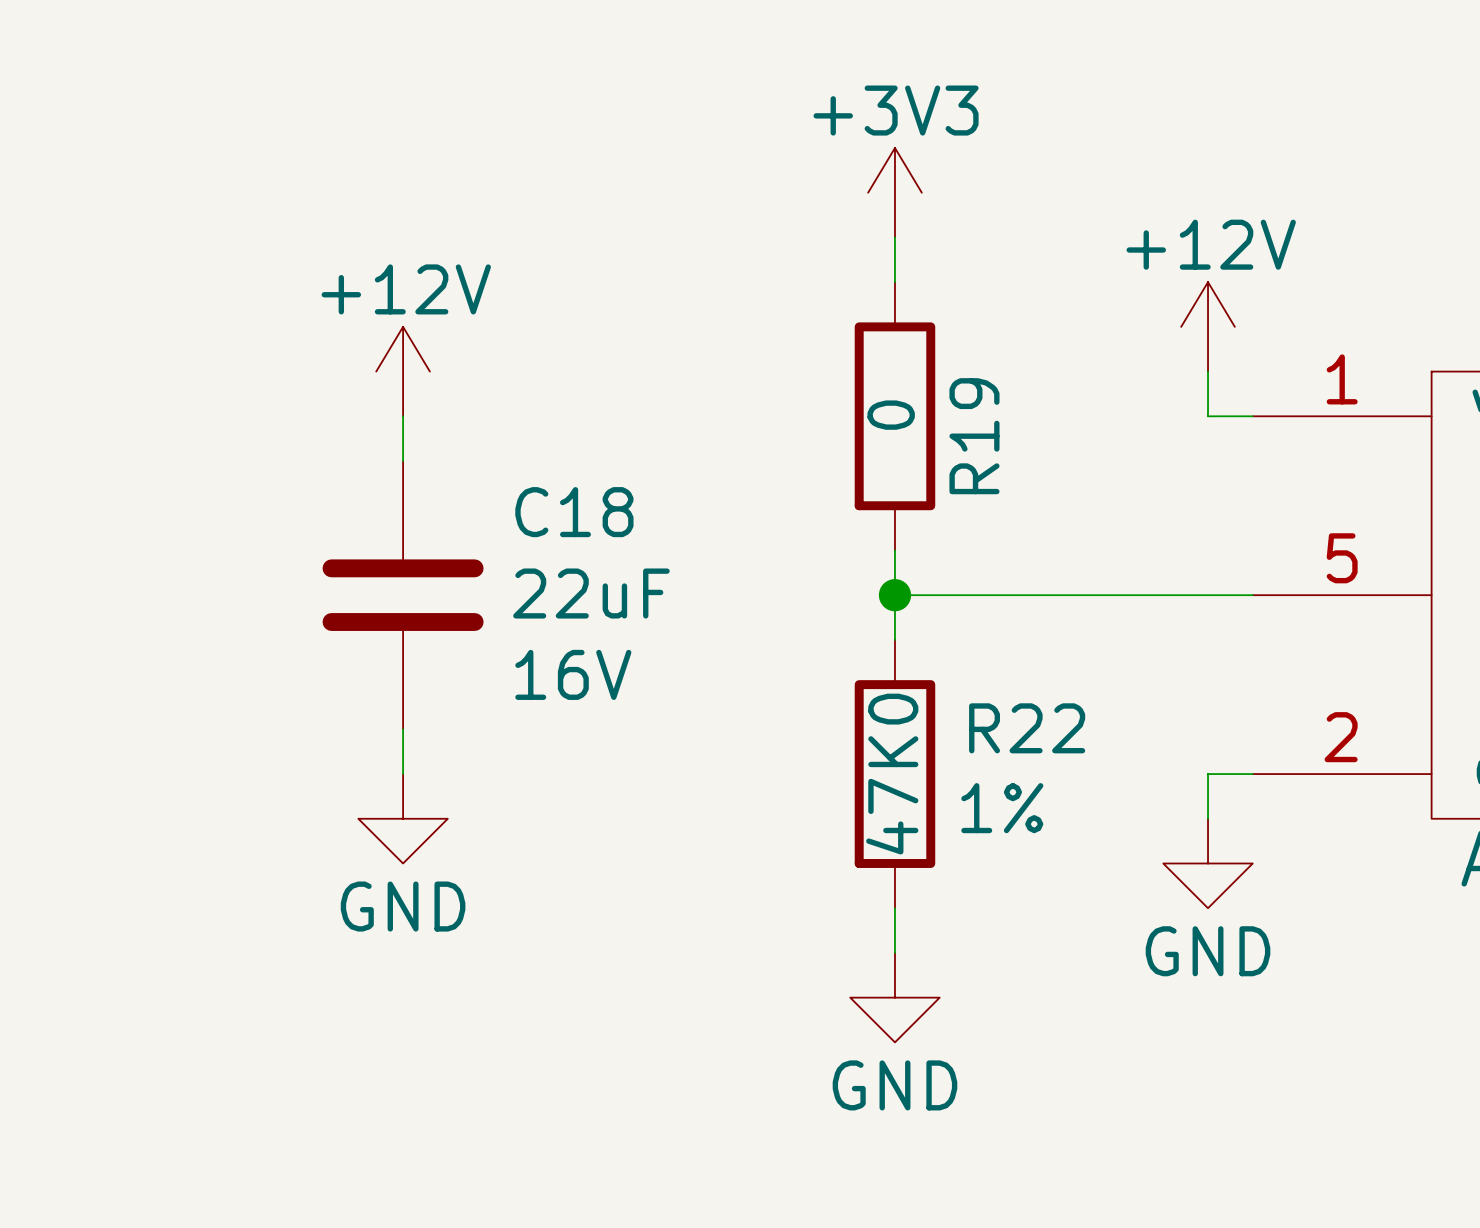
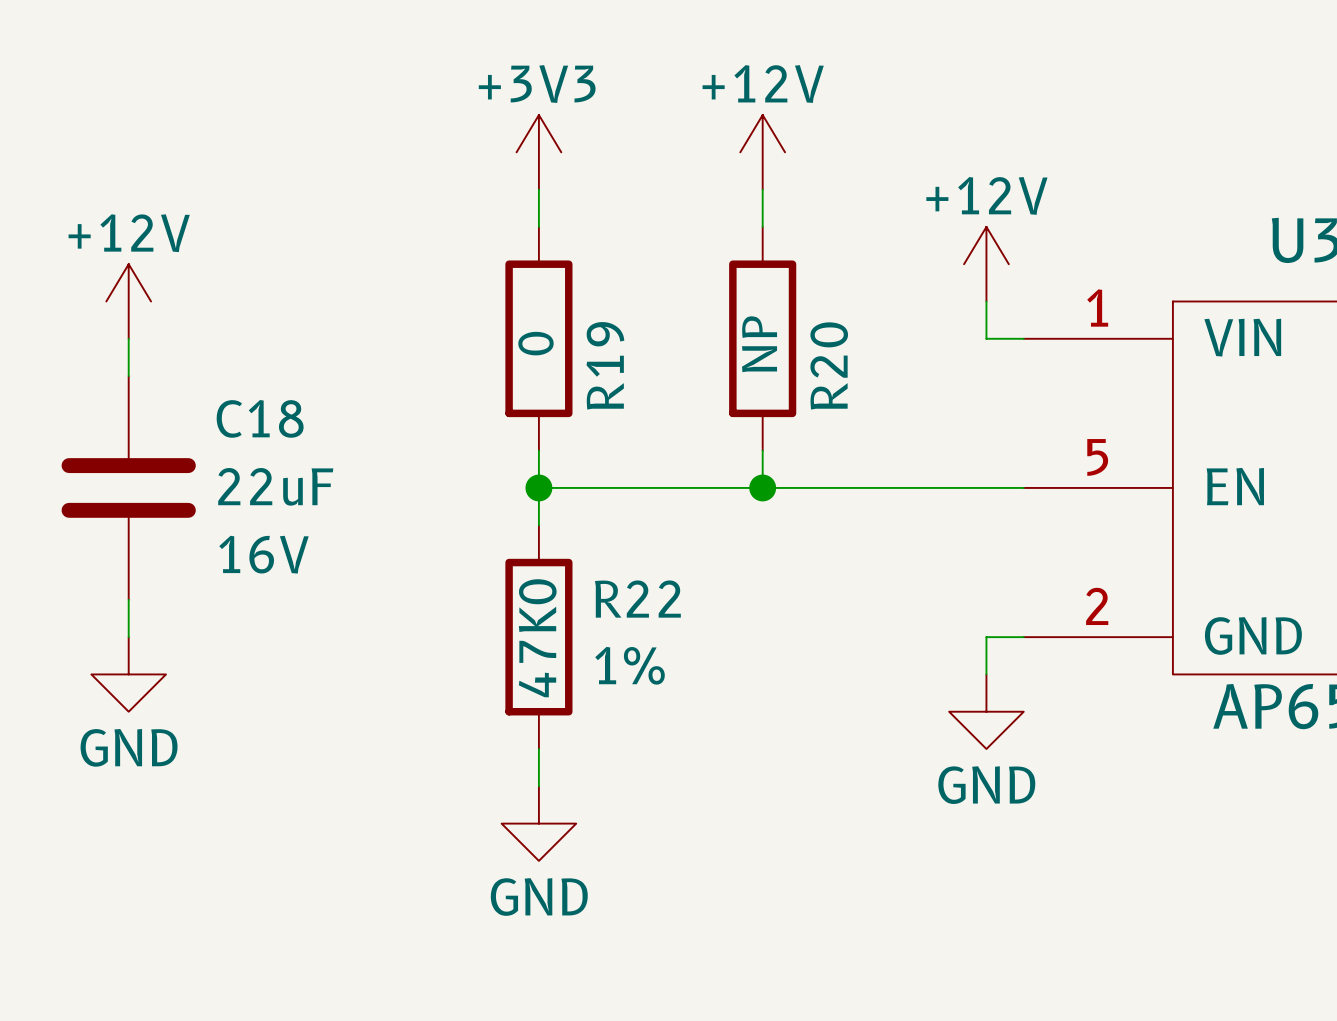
power symbol position: +3V3 (894, 192) -> +3V3 (538, 152)
power symbol: none -> +12V (762, 152)
wire: (894, 237) (894, 282) -> (538, 189) (538, 226)
wire: none -> (762, 189) (762, 226)
power symbol position: +12V (403, 371) -> +12V (128, 301)
wire: (403, 416) (403, 461) -> (128, 338) (128, 376)
R19 position: (894, 416) -> (538, 338)
R20: none -> (762, 338)
wire: (894, 550) (894, 639) -> (538, 450) (538, 525)
wire: none -> (762, 450) (762, 487)
C18 position: (403, 595) -> (128, 487)
wire: none -> (538, 487) (725, 487)
junction: none -> (538, 487)
junction position: (894, 595) -> (762, 487)
wire: (403, 729) (403, 774) -> (128, 599) (128, 637)
R22 position: (894, 774) -> (538, 637)
power symbol: none -> GND (128, 674)
power symbol: GND (403, 818) -> none
wire: (894, 908) (894, 952) -> (538, 749) (538, 786)
power symbol: none -> GND (538, 823)
power symbol: GND (894, 997) -> none

